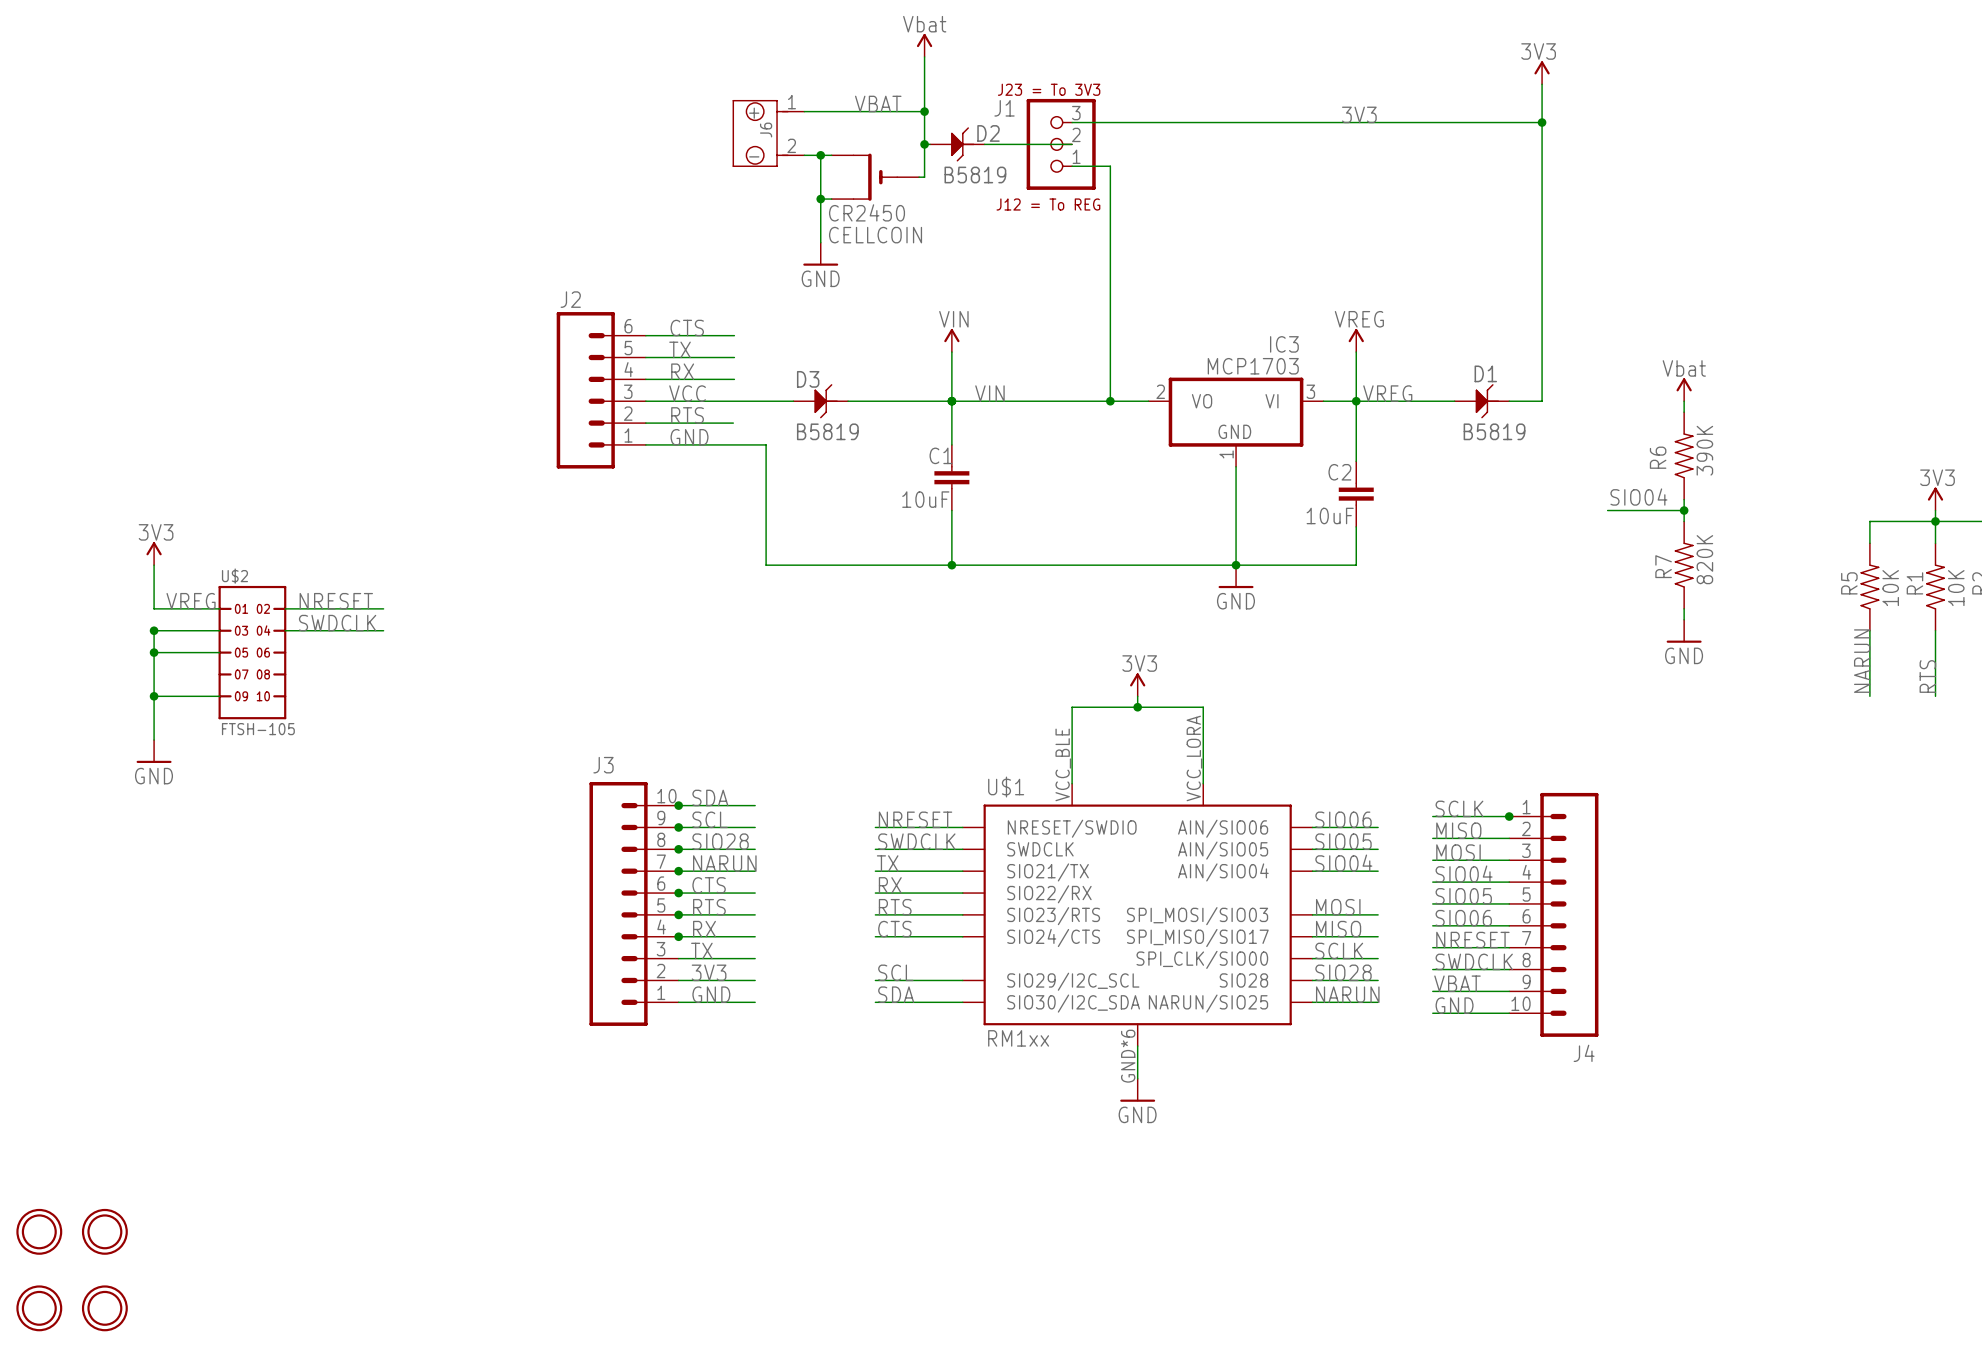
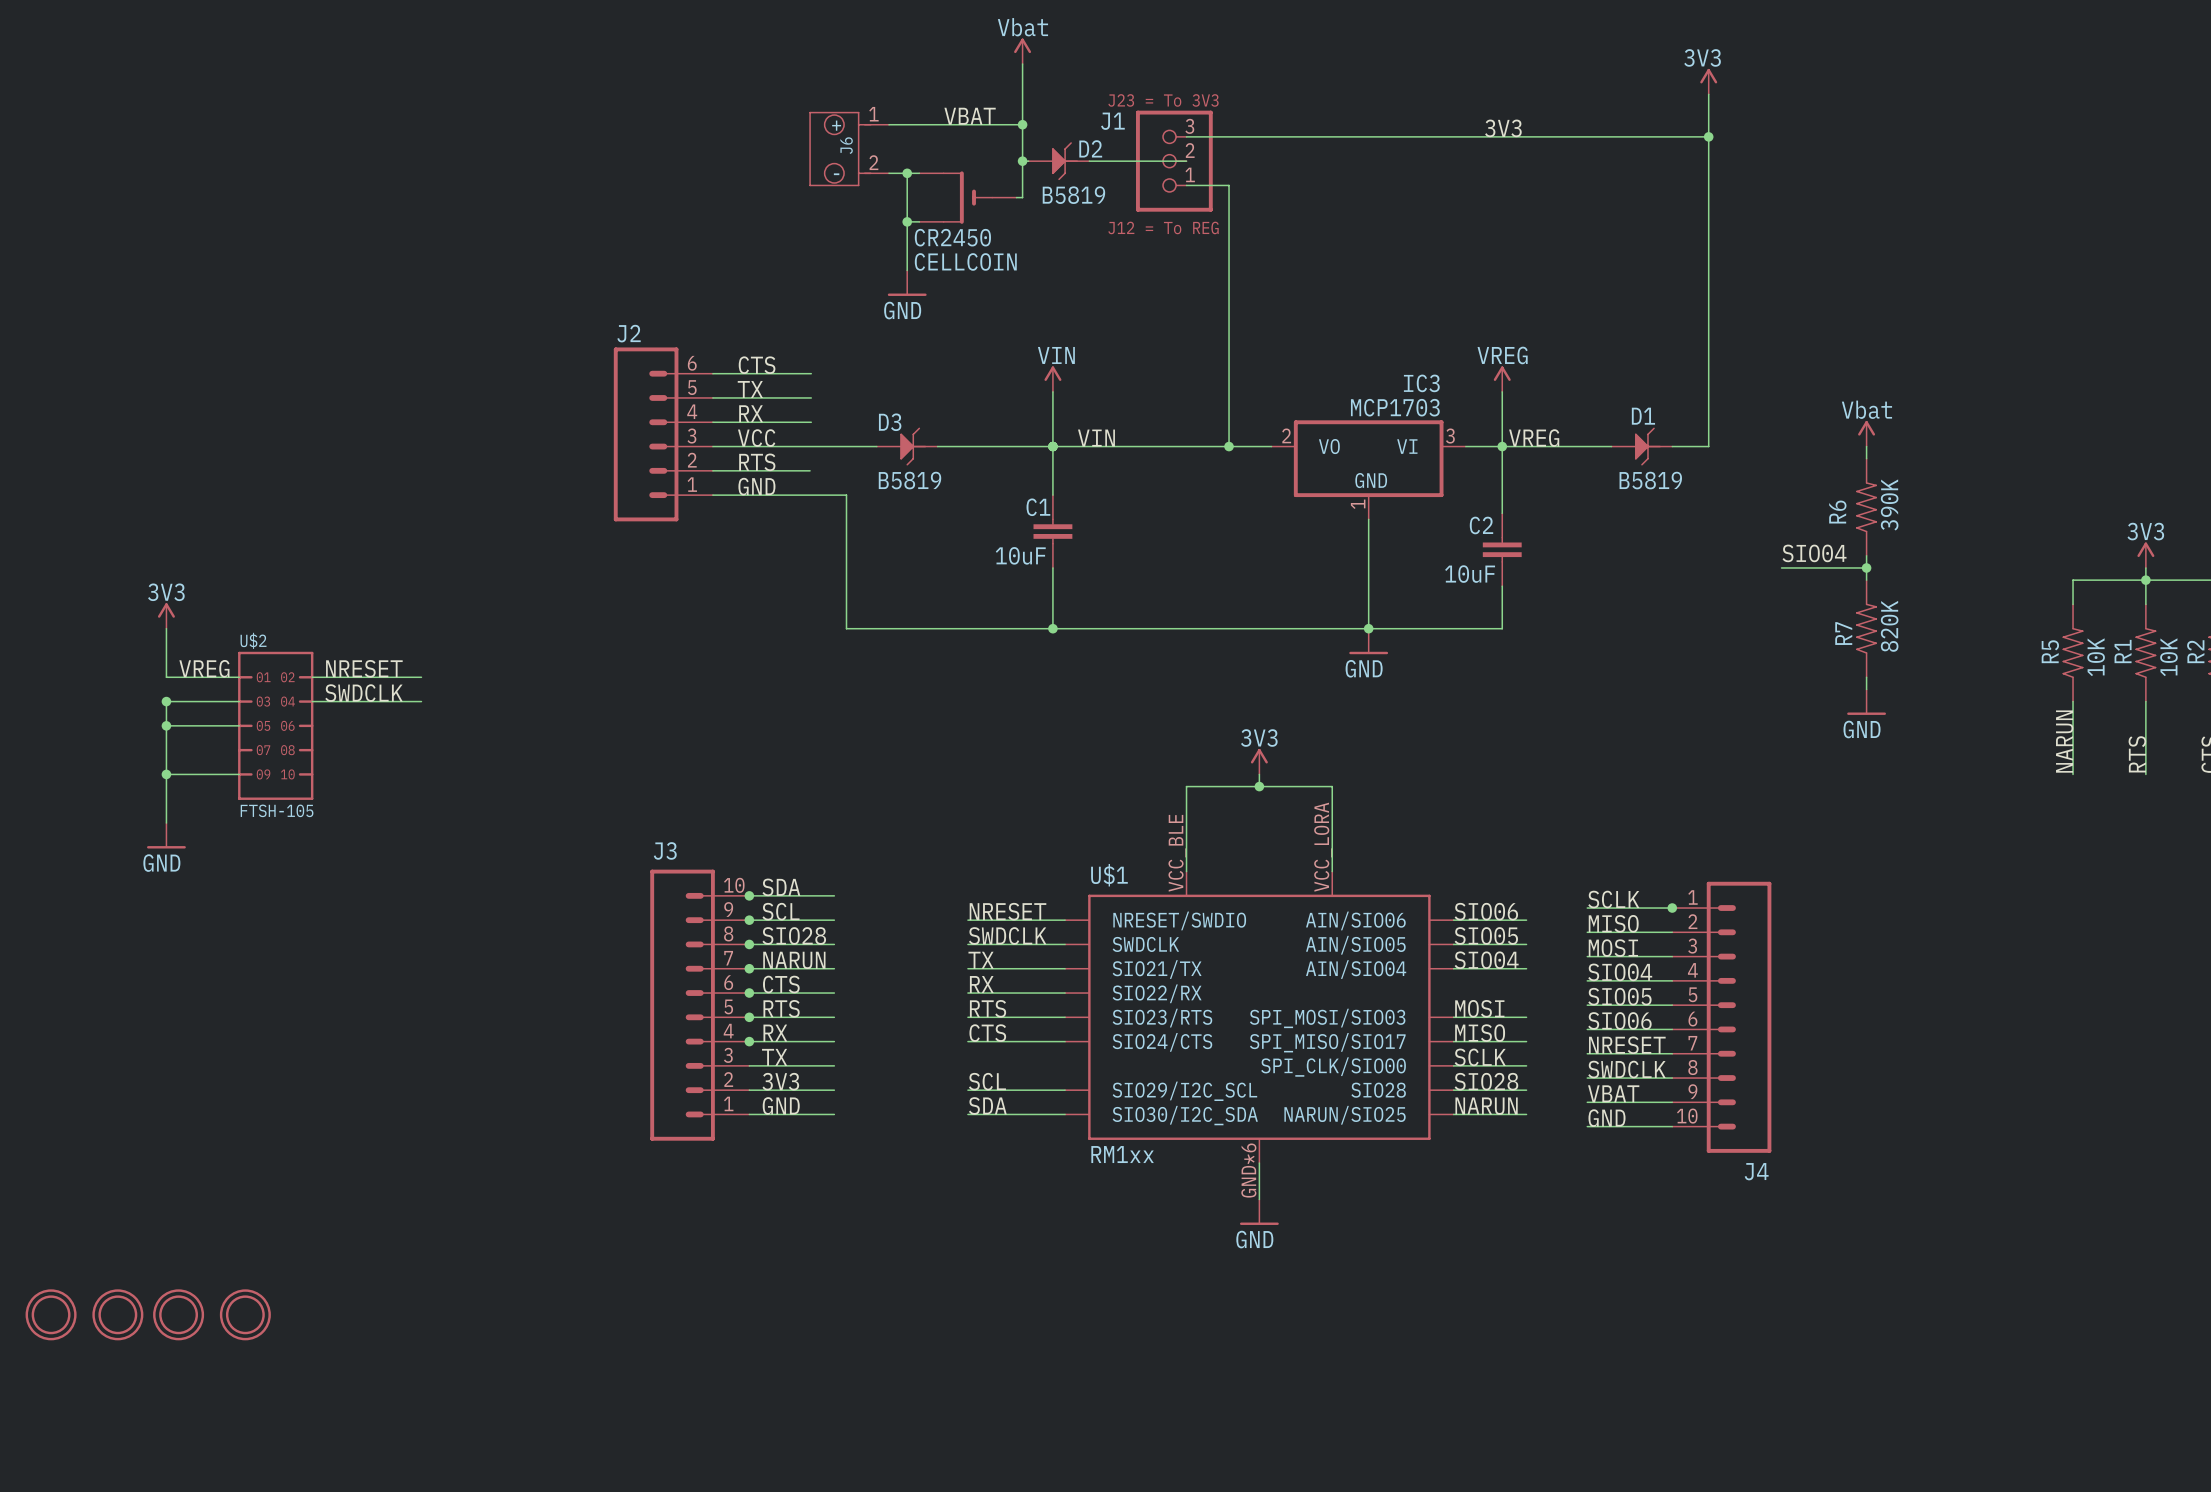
part: none -> (51, 1314)
part: none -> (117, 1314)
part: none -> (178, 1314)
part: none -> (245, 1314)
part: (39, 1231) -> none
part: (104, 1231) -> none
part: (39, 1308) -> none
part: (104, 1308) -> none

